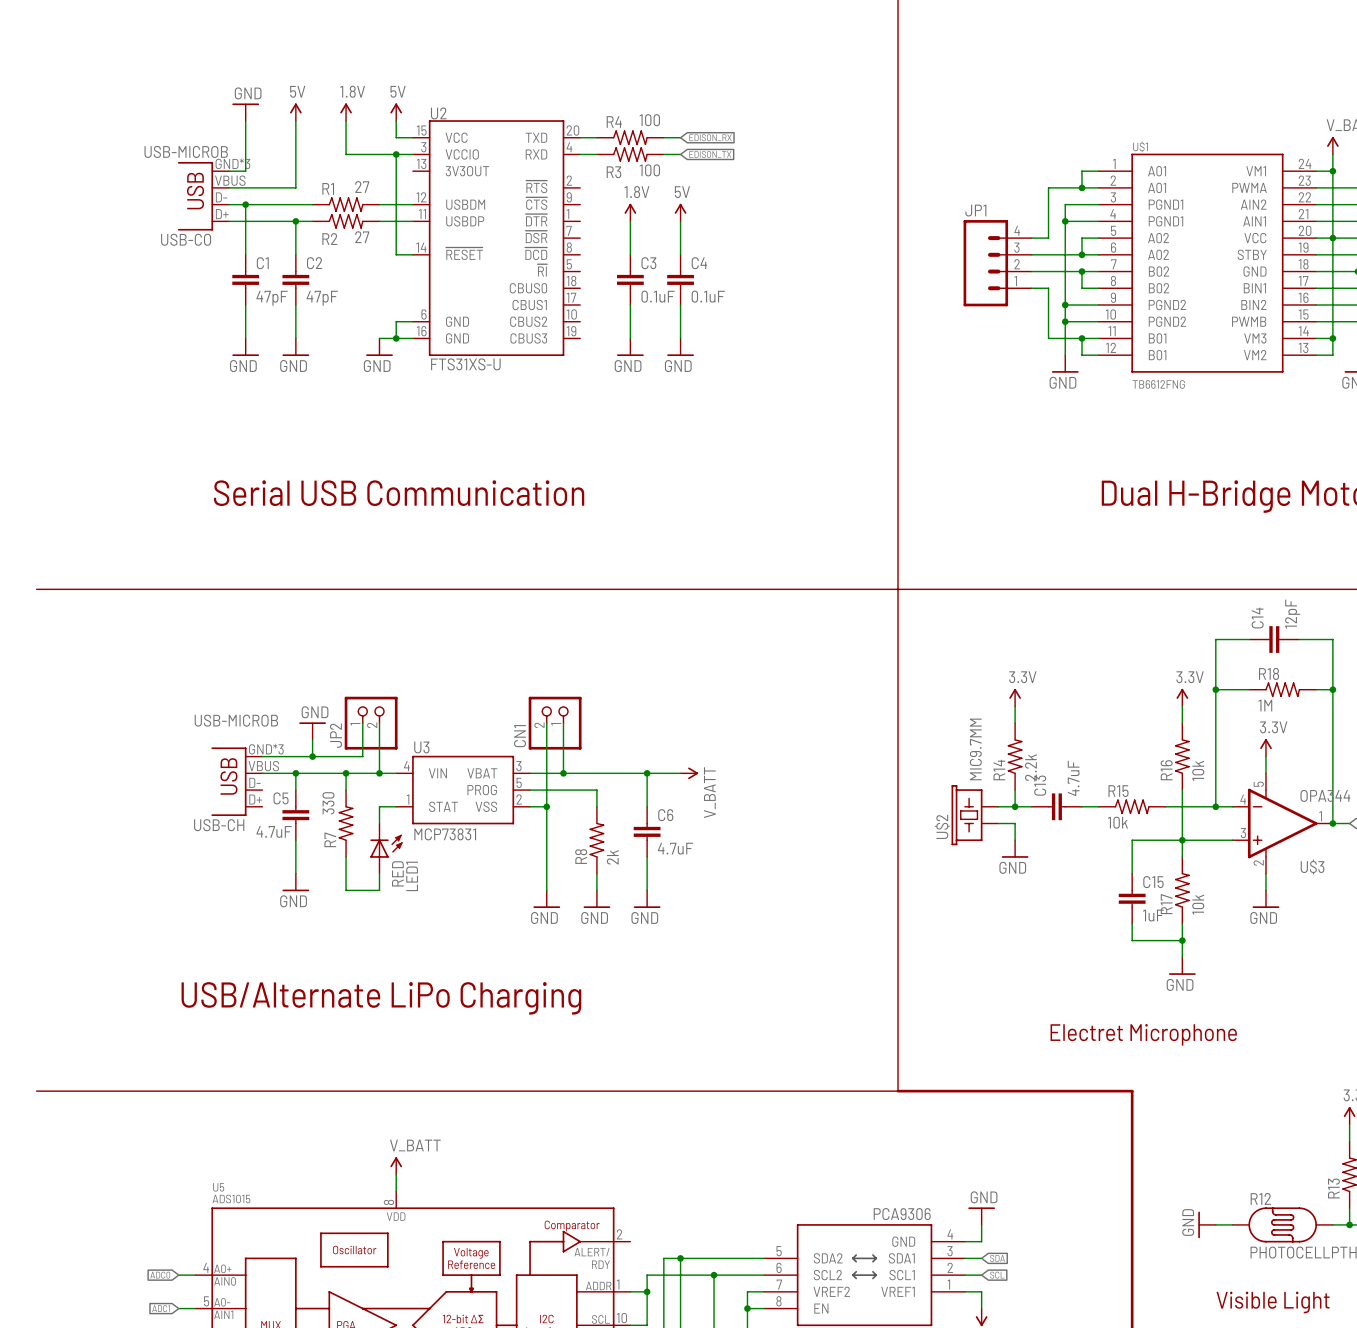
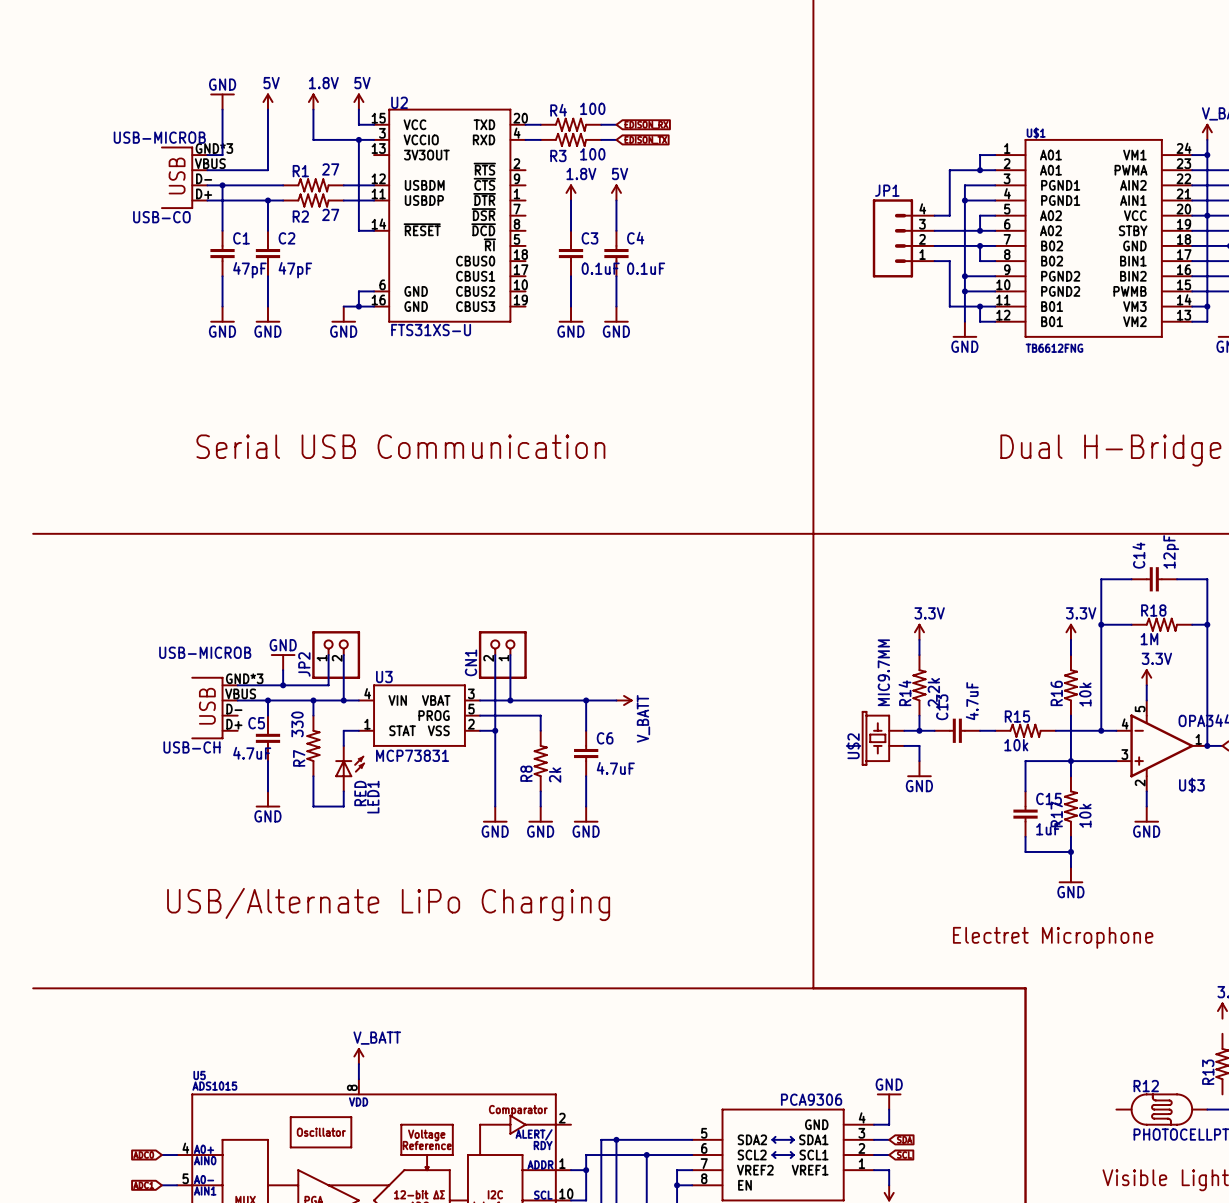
wire: (1349, 1124) (1349, 1141) -> none
wire: (1349, 1208) (1349, 1224) -> none
power symbol: GND (1207, 1224) -> none
wire: (1215, 1224) (1232, 1224) -> none
junction: (1349, 1224) -> none

